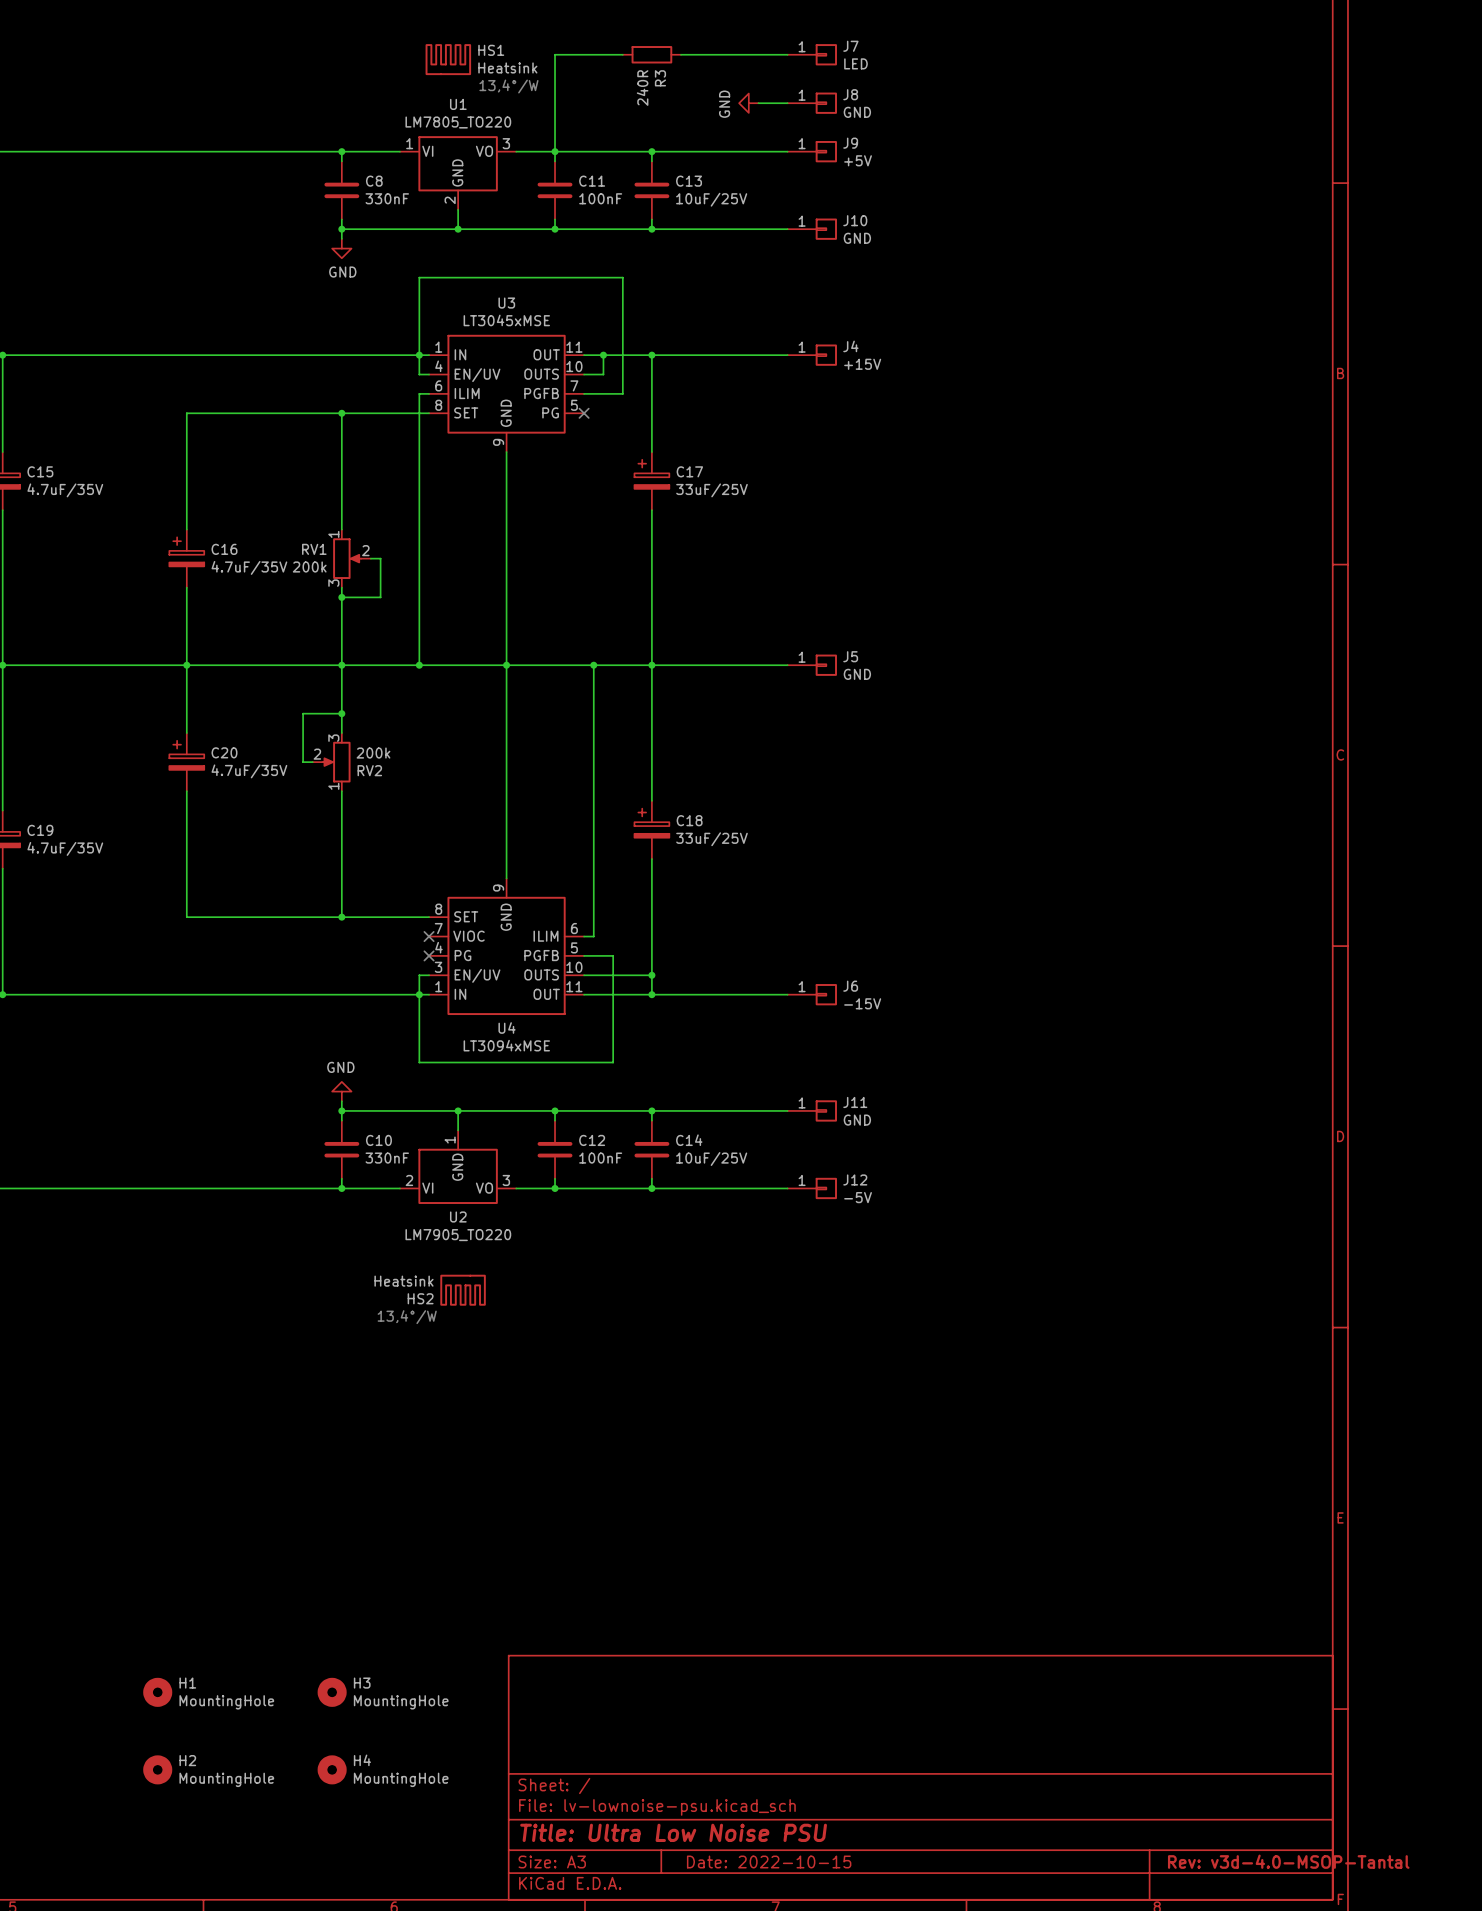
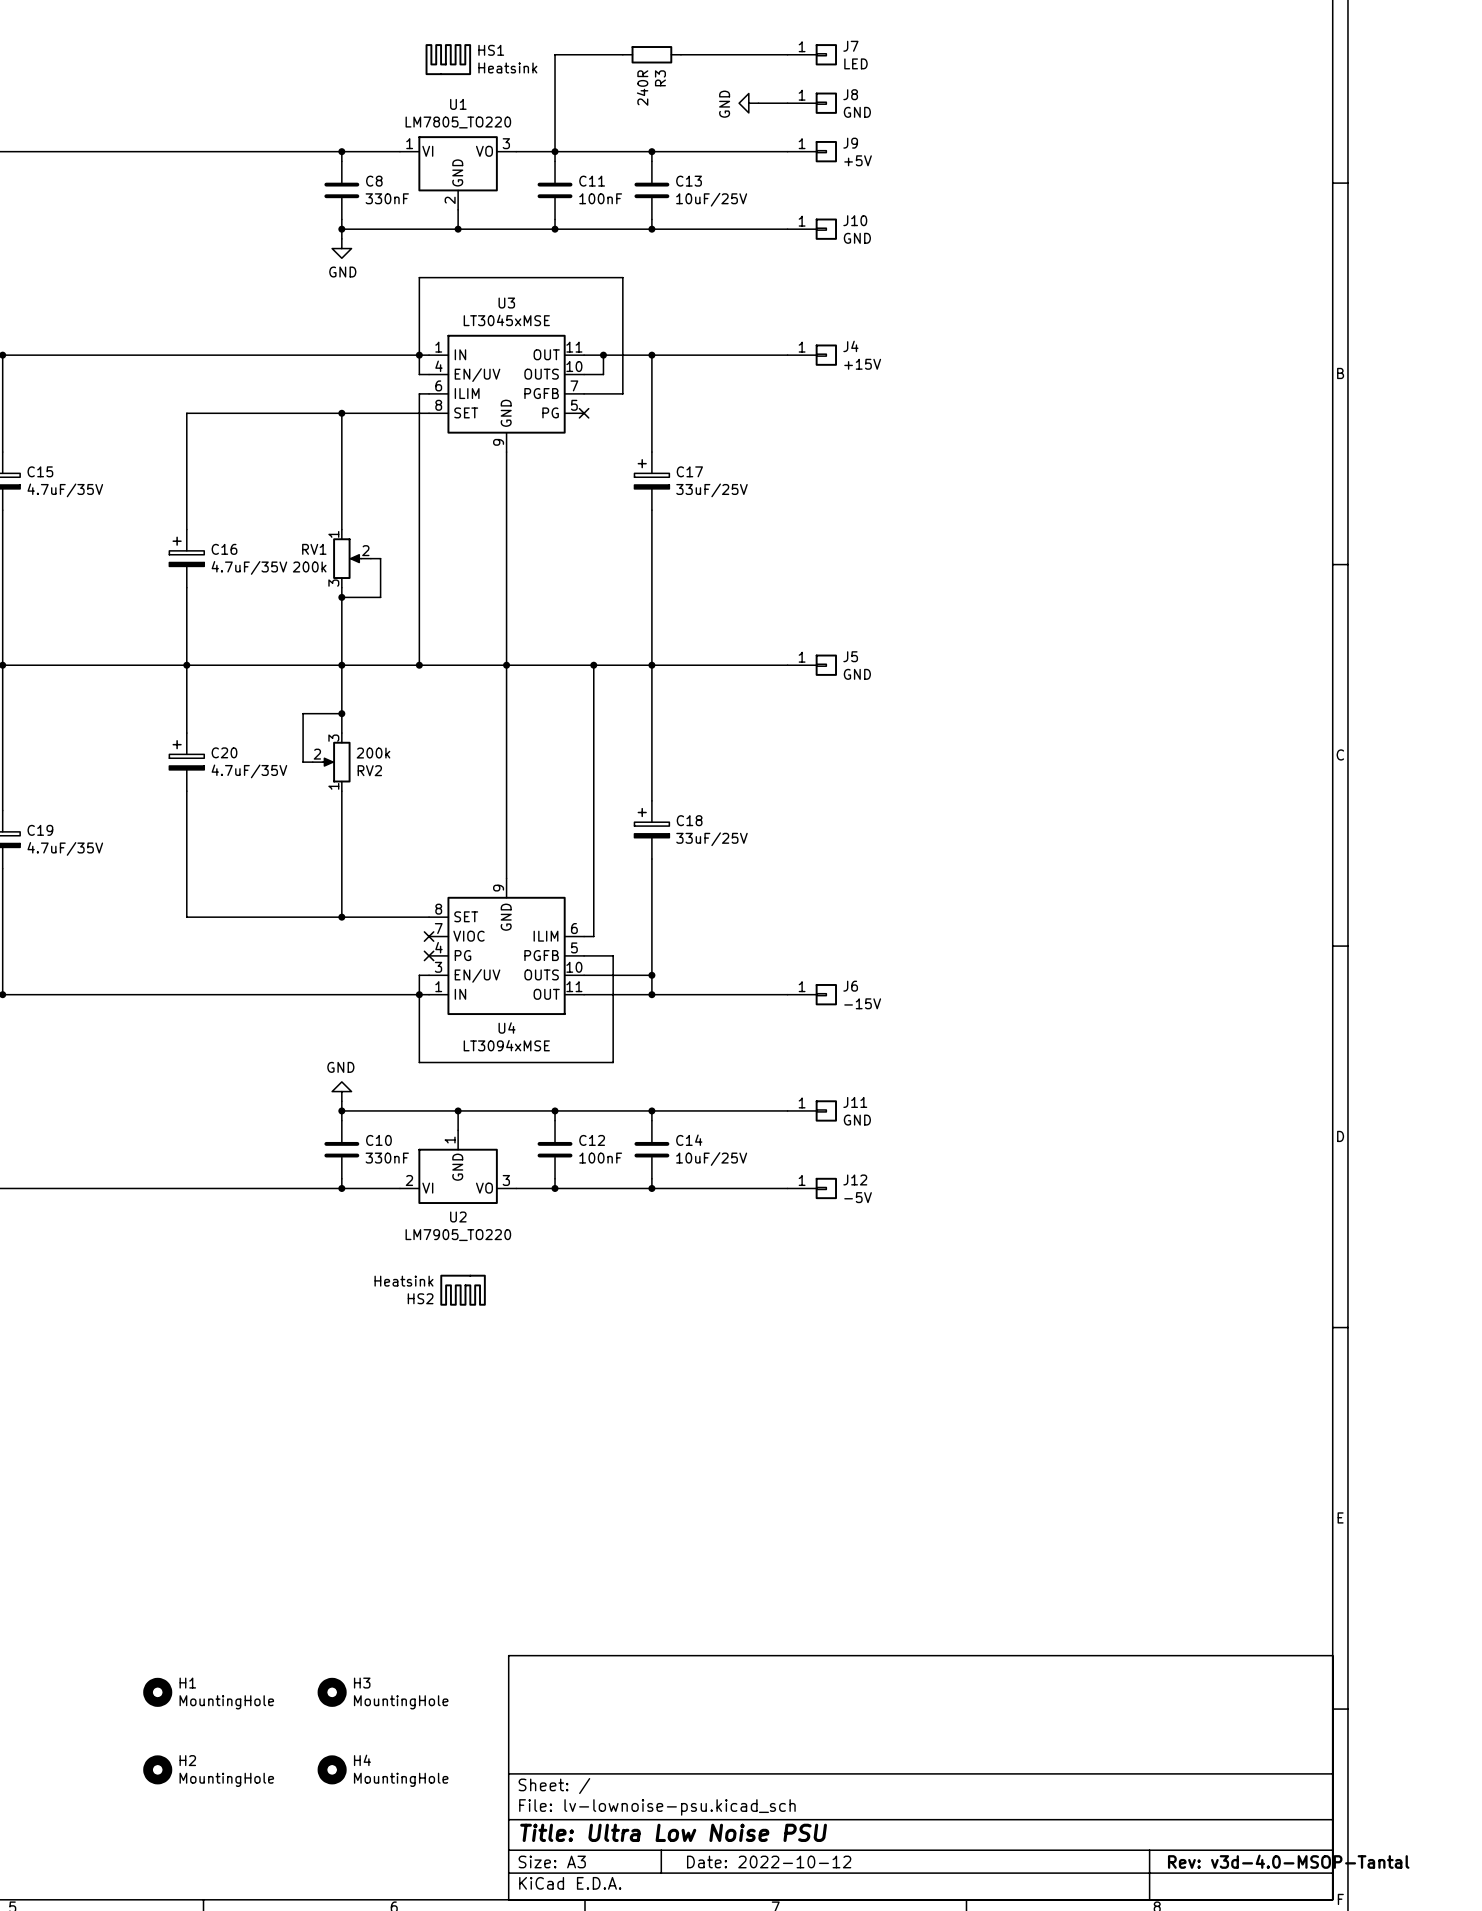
text: 13,4°/W (508, 86) -> none
text: 13,4°/W (407, 1317) -> none
title block: Date: 2022-10-15 (769, 1861) -> Date: 2022-10-12 (769, 1861)

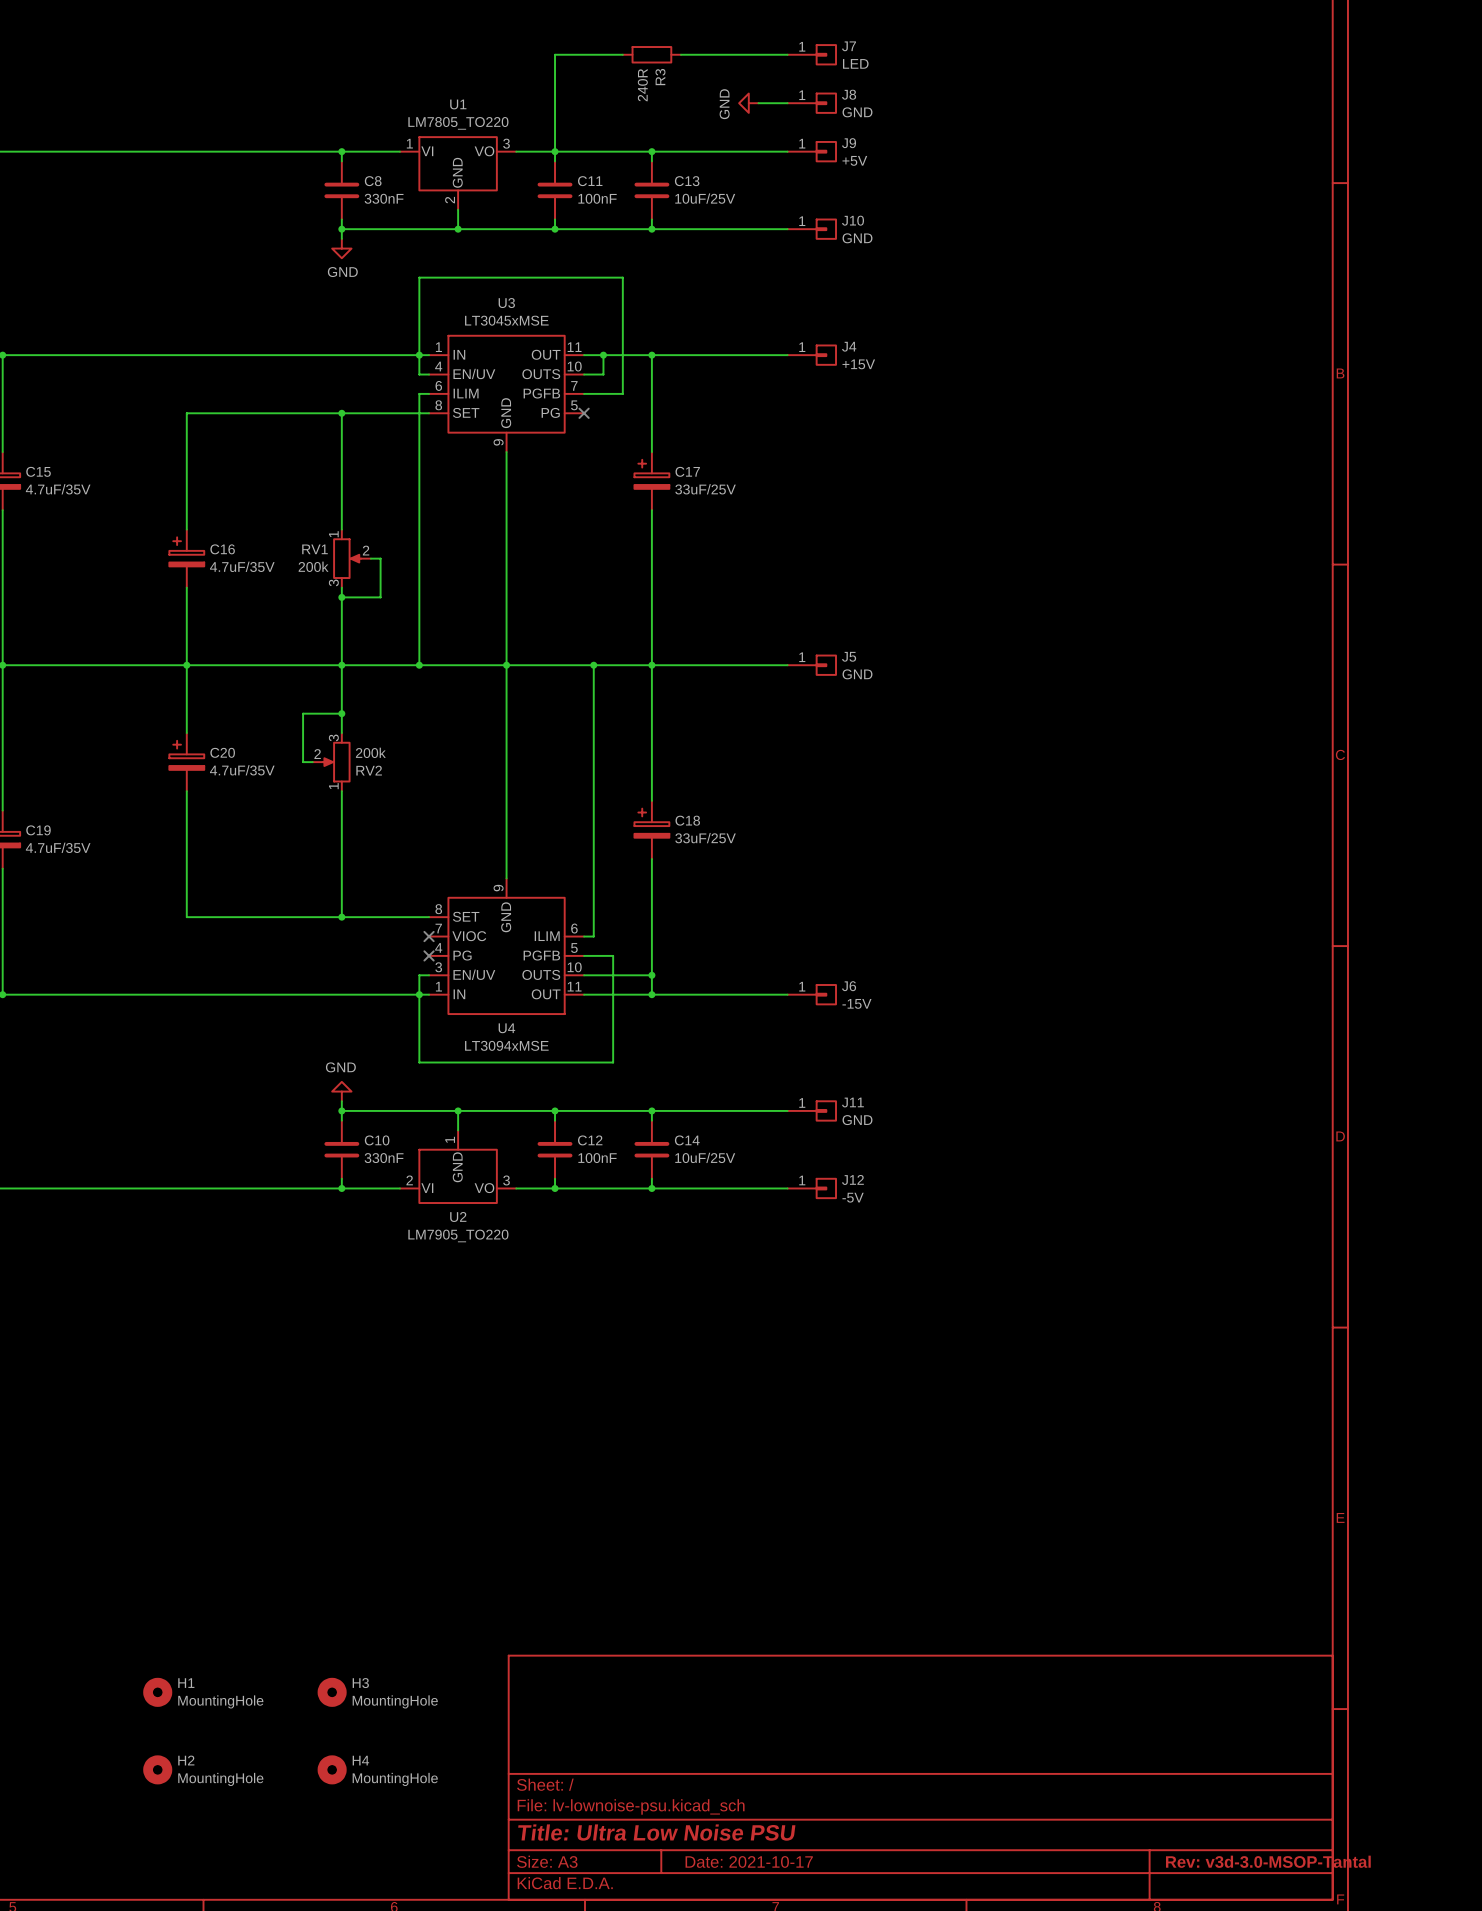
HS1: Heatsink (448, 59) -> none
HS2: Heatsink (463, 1290) -> none
title block: Date: 2022-10-12 (769, 1861) -> Date: 2021-10-17 (749, 1861)
title block: Rev: v3d-4.0-MSOP-Tantal (1288, 1861) -> Rev: v3d-3.0-MSOP-Tantal (1268, 1861)

